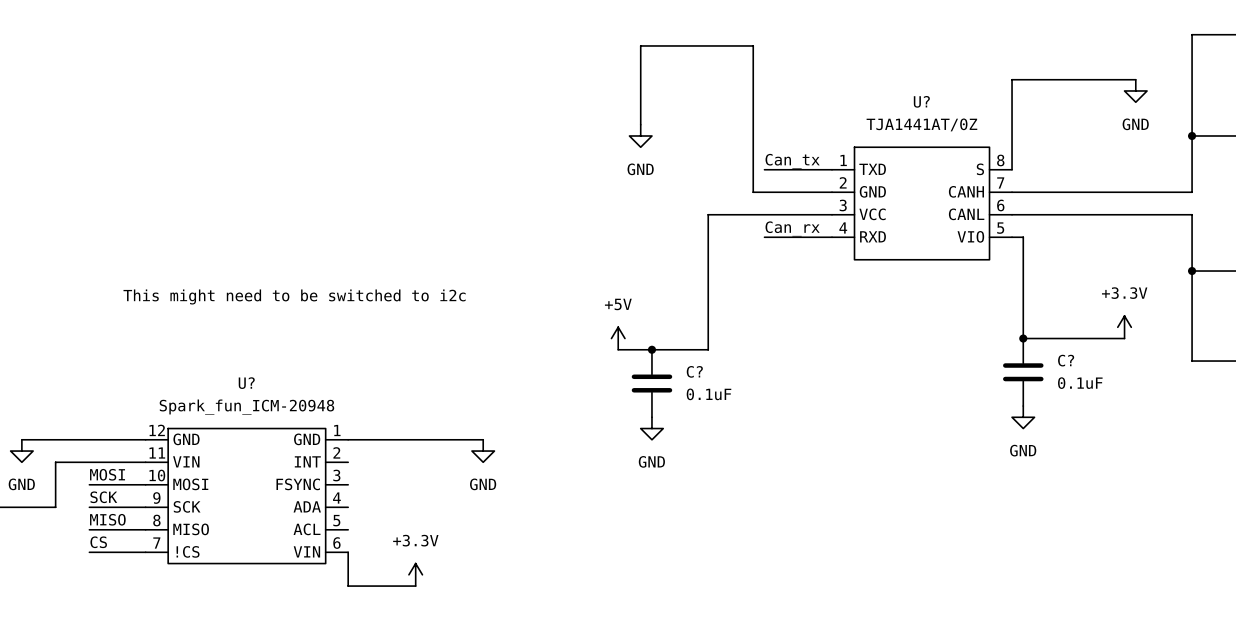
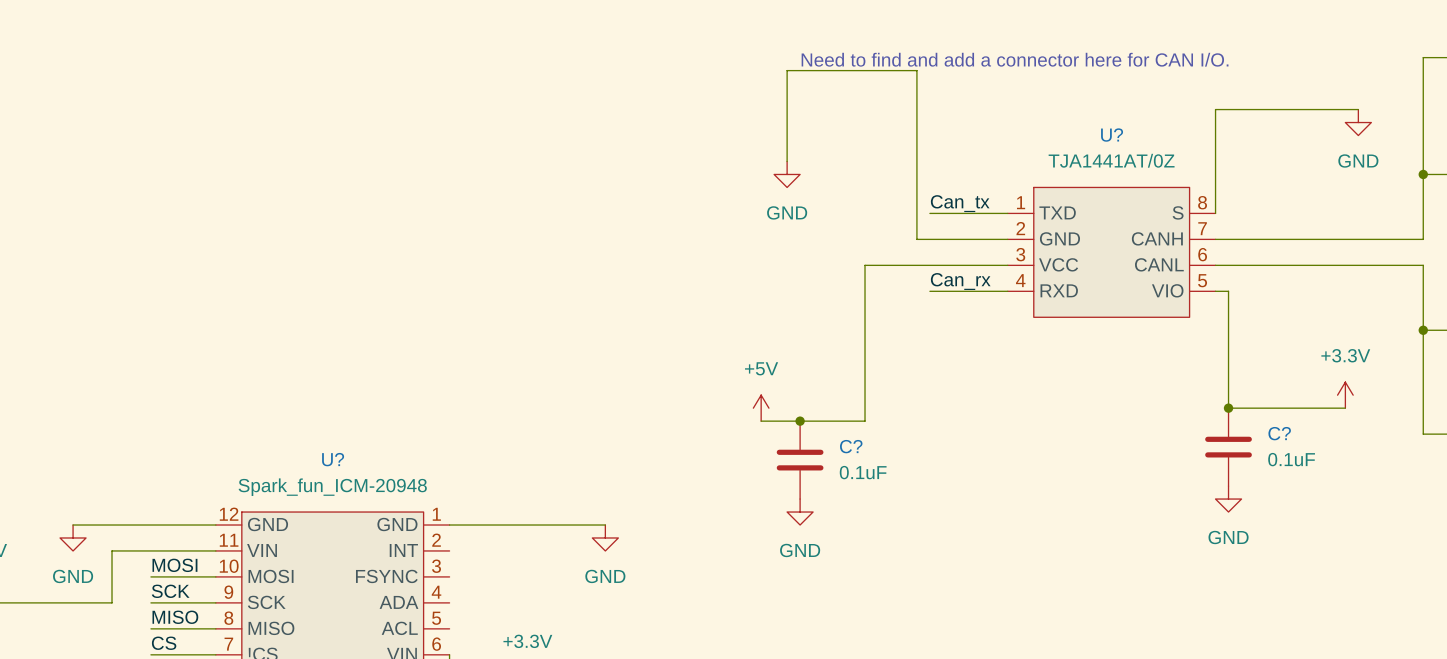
text: none -> Need to find and add a connector here for CAN I/O. (1015, 59)
text: This might need to be switched to i2c (294, 296) -> none

